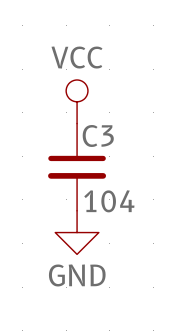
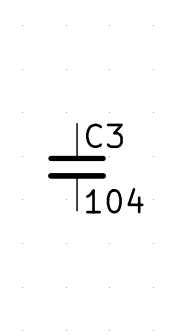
power symbol: VCC (77, 101) -> none
power symbol: GND (77, 232) -> none

